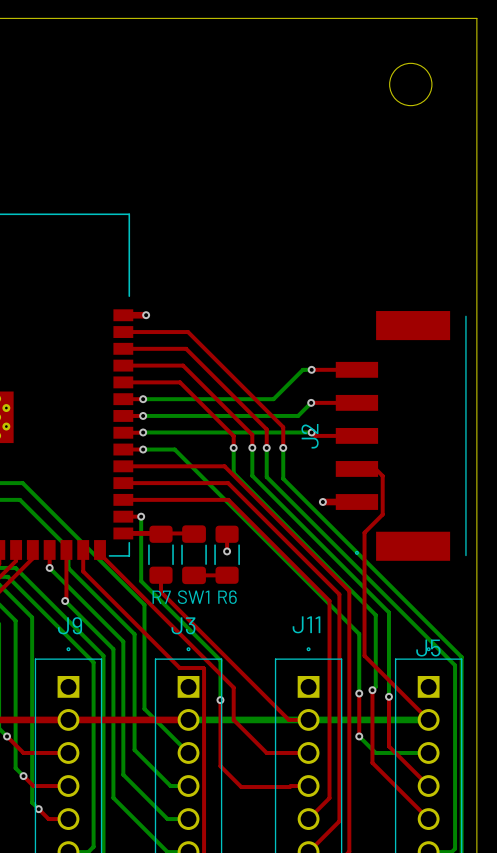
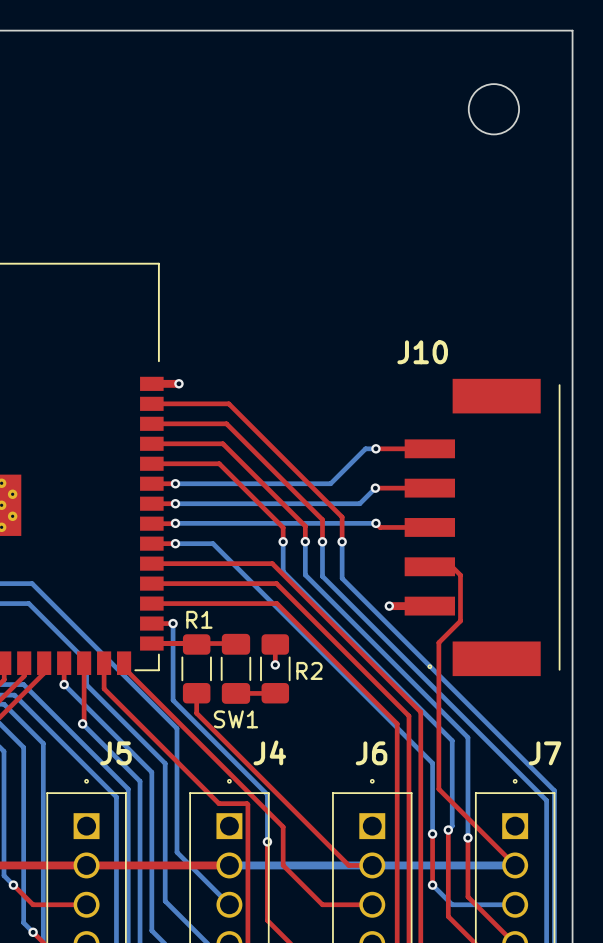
J2 name: J2 (310, 436) -> J10 (422, 352)
R7 name: R7 (161, 597) -> R1 (199, 619)
R6 name: R6 (227, 597) -> R2 (309, 670)
J11 name: J11 (306, 624) -> J6 (371, 753)
J9 name: J9 (70, 625) -> J5 (115, 753)
J3 name: J3 (183, 625) -> J4 (269, 752)
J5 name: J5 (428, 648) -> J7 (545, 753)

